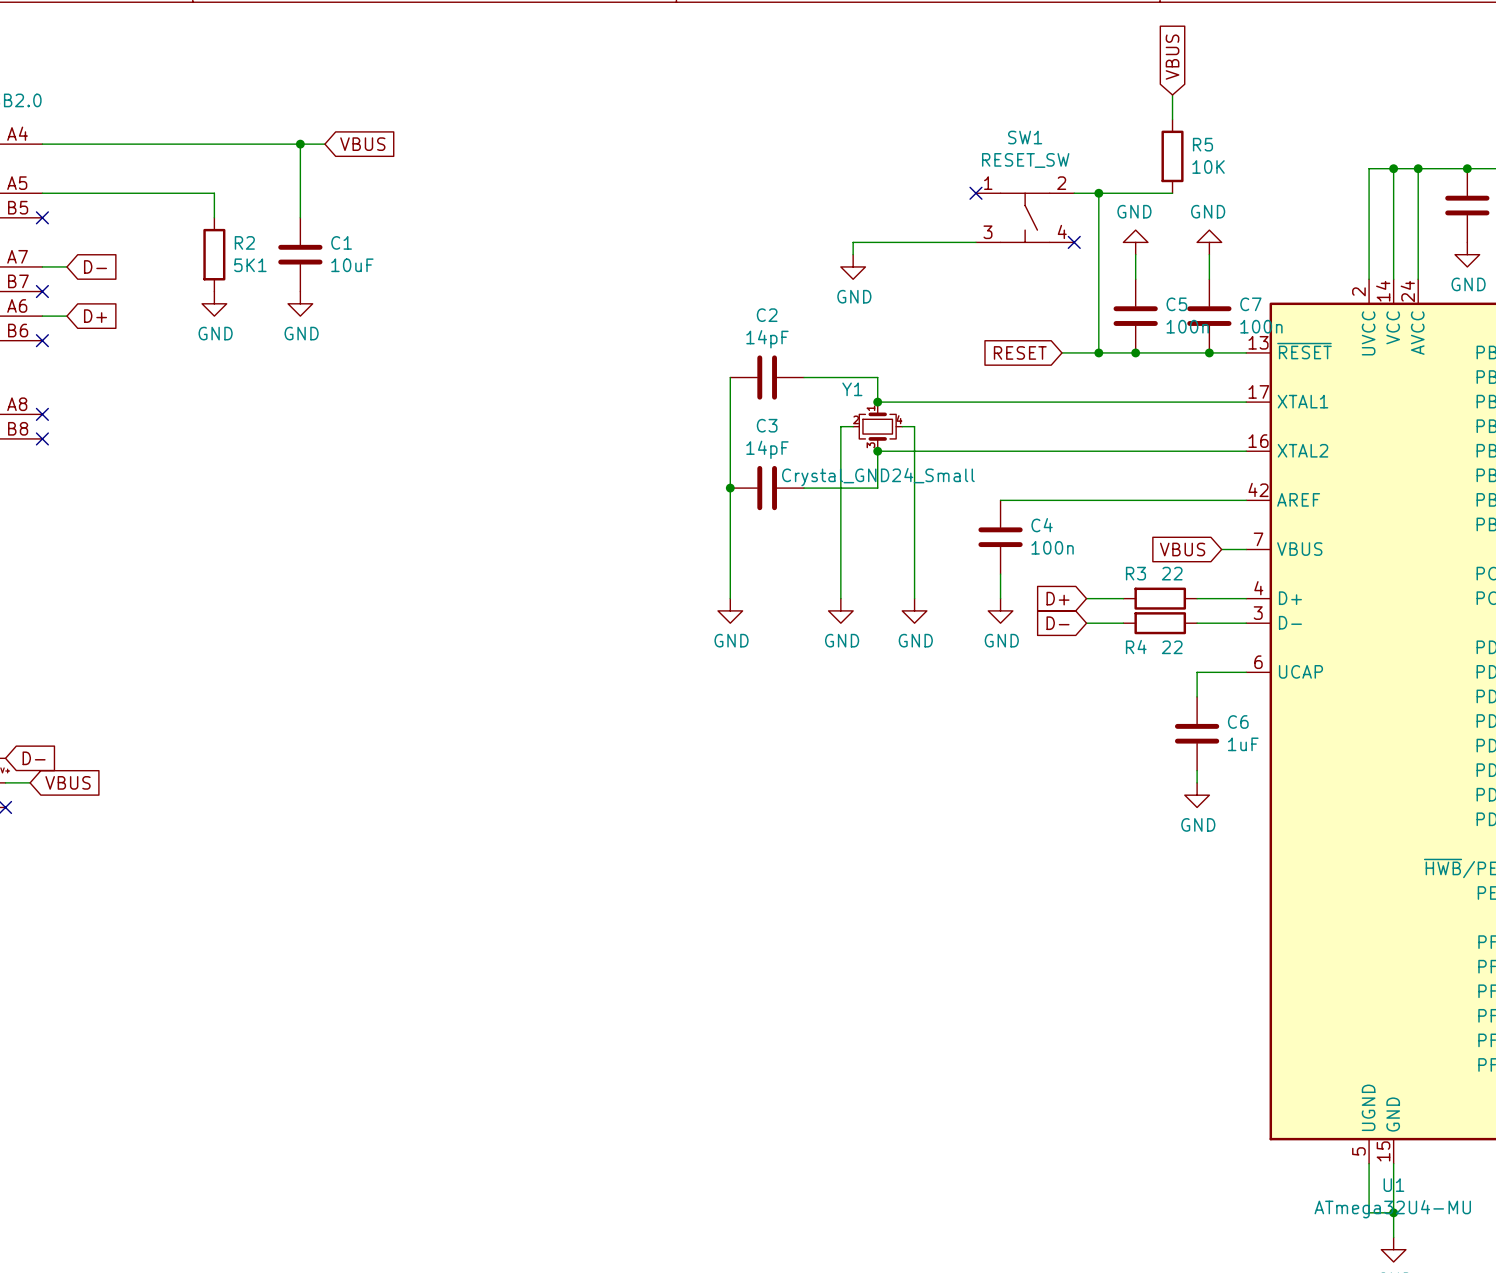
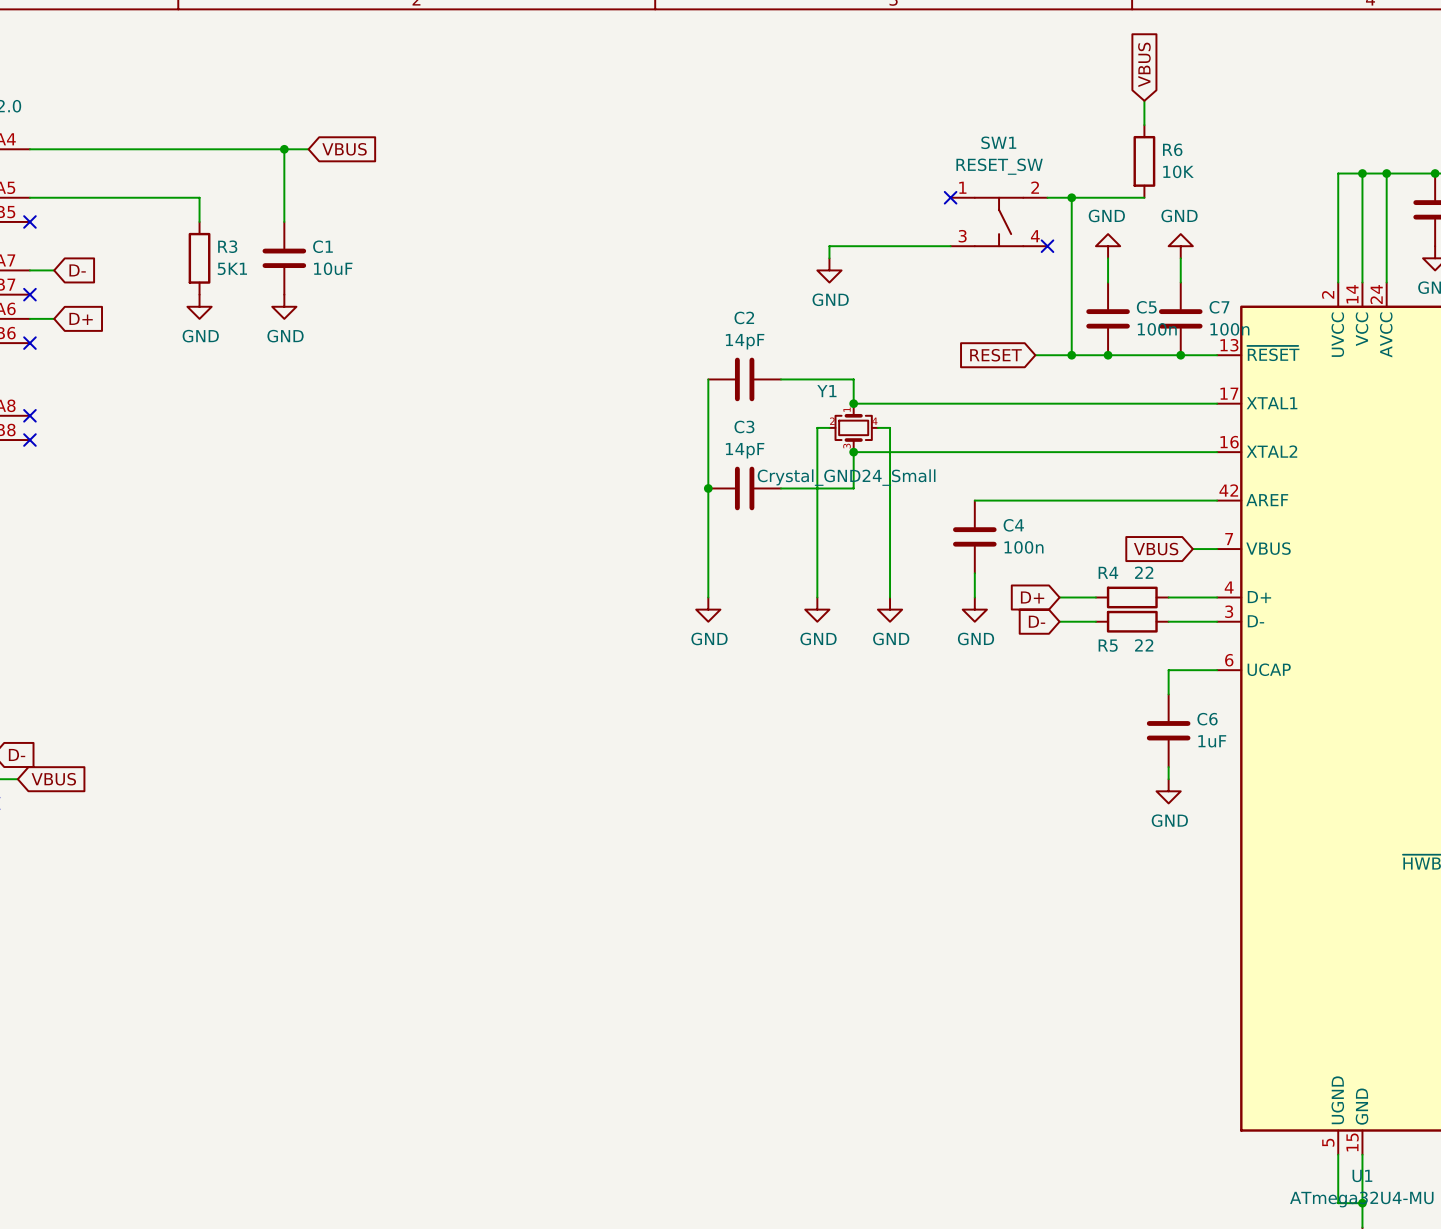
R5 name: R5 (1202, 144) -> R6 (1172, 149)
R2 name: R2 (244, 242) -> R3 (227, 246)
R3 name: R3 (1135, 573) -> R4 (1108, 572)
R4 name: R4 (1136, 647) -> R5 (1108, 645)

